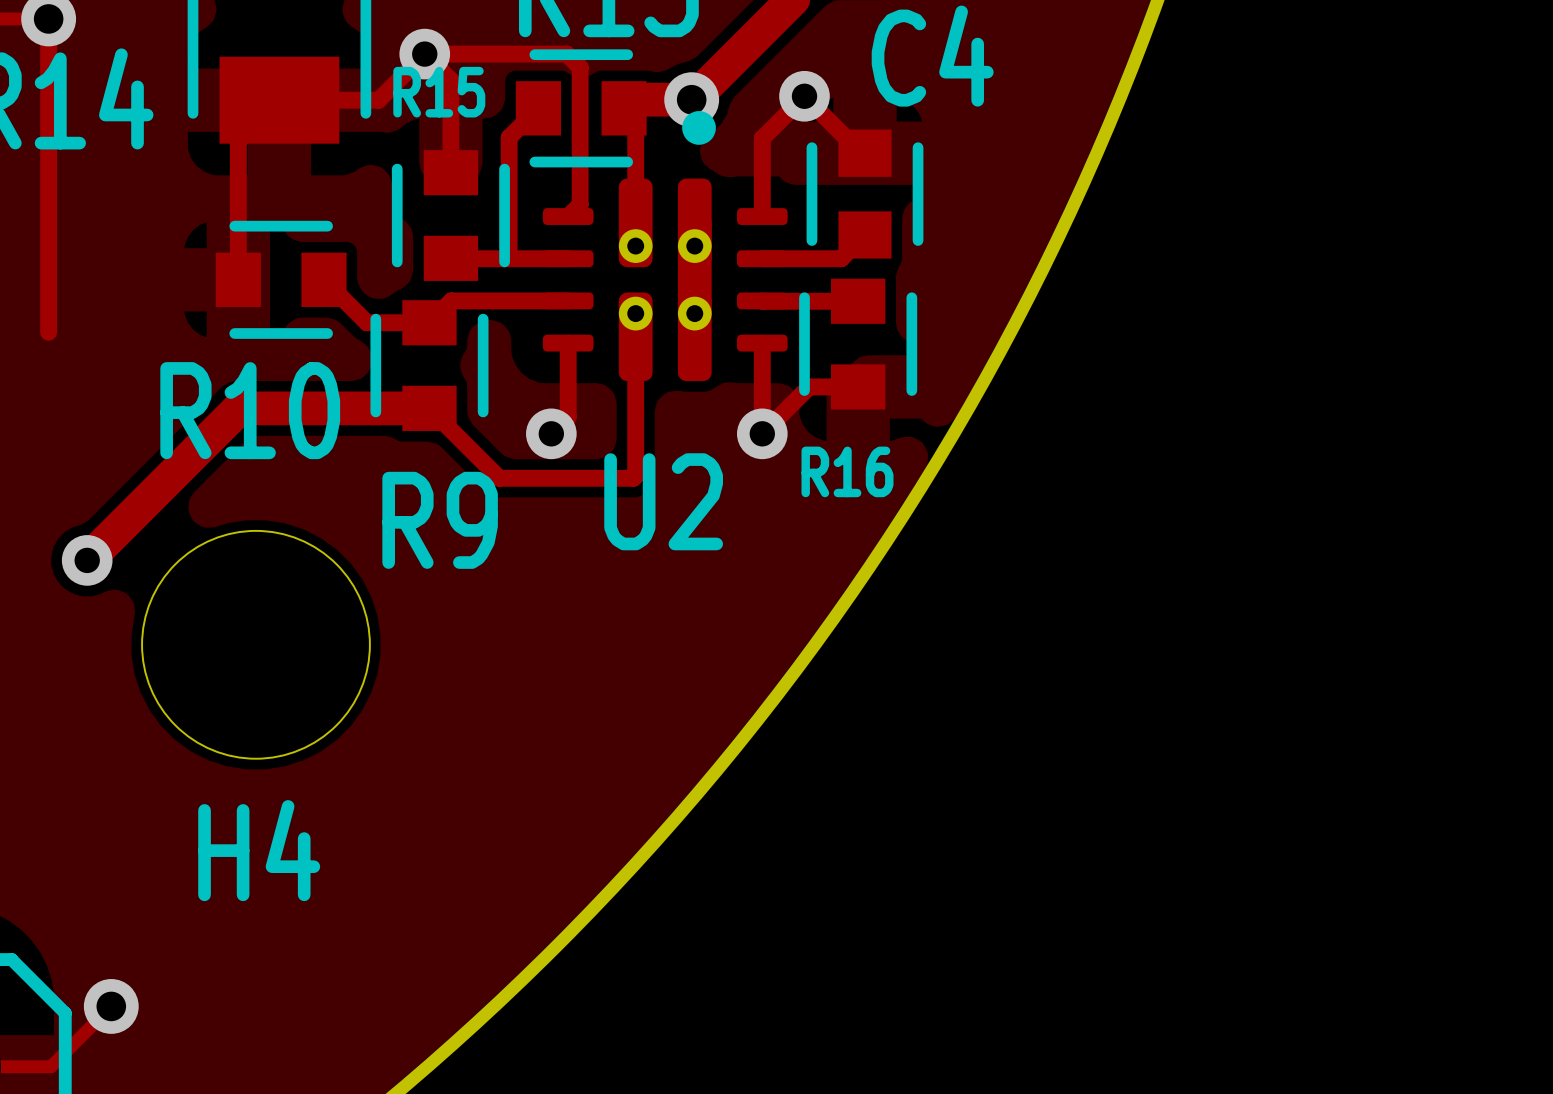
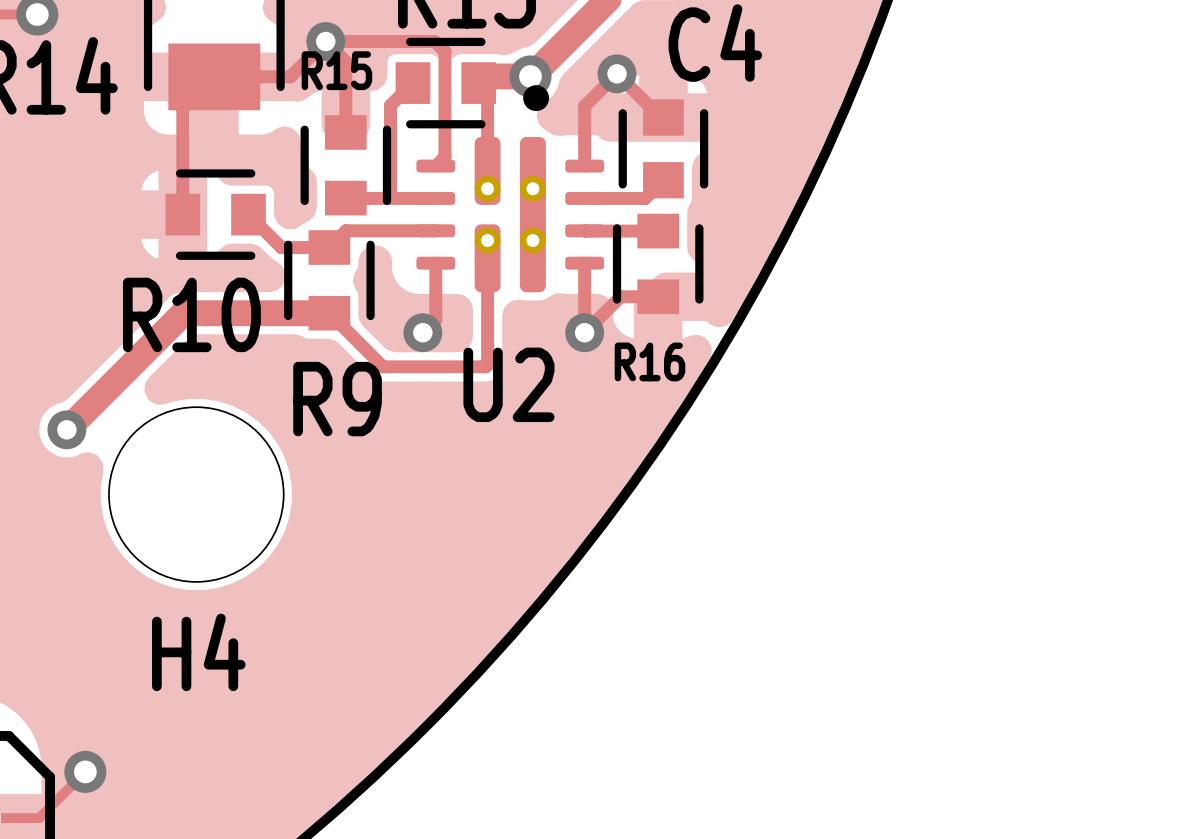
track: (48, 18) (48, 332) -> none

